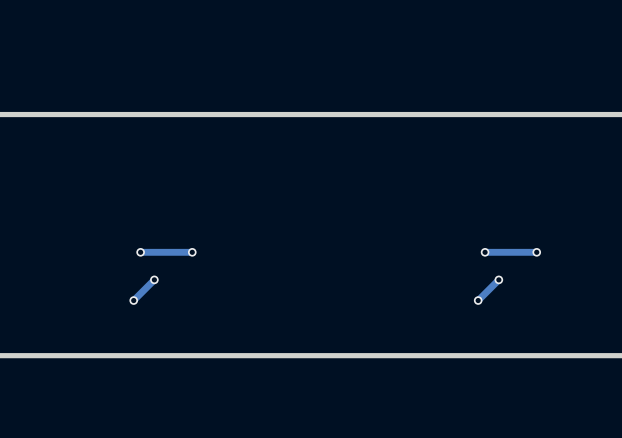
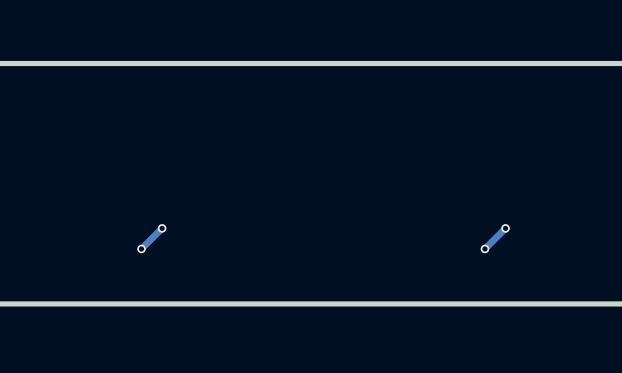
via: (140, 252) -> none
track: (192, 252) (140, 252) -> none
via: (192, 252) -> none
via: (485, 252) -> none
track: (536, 252) (485, 252) -> none
via: (536, 252) -> none

